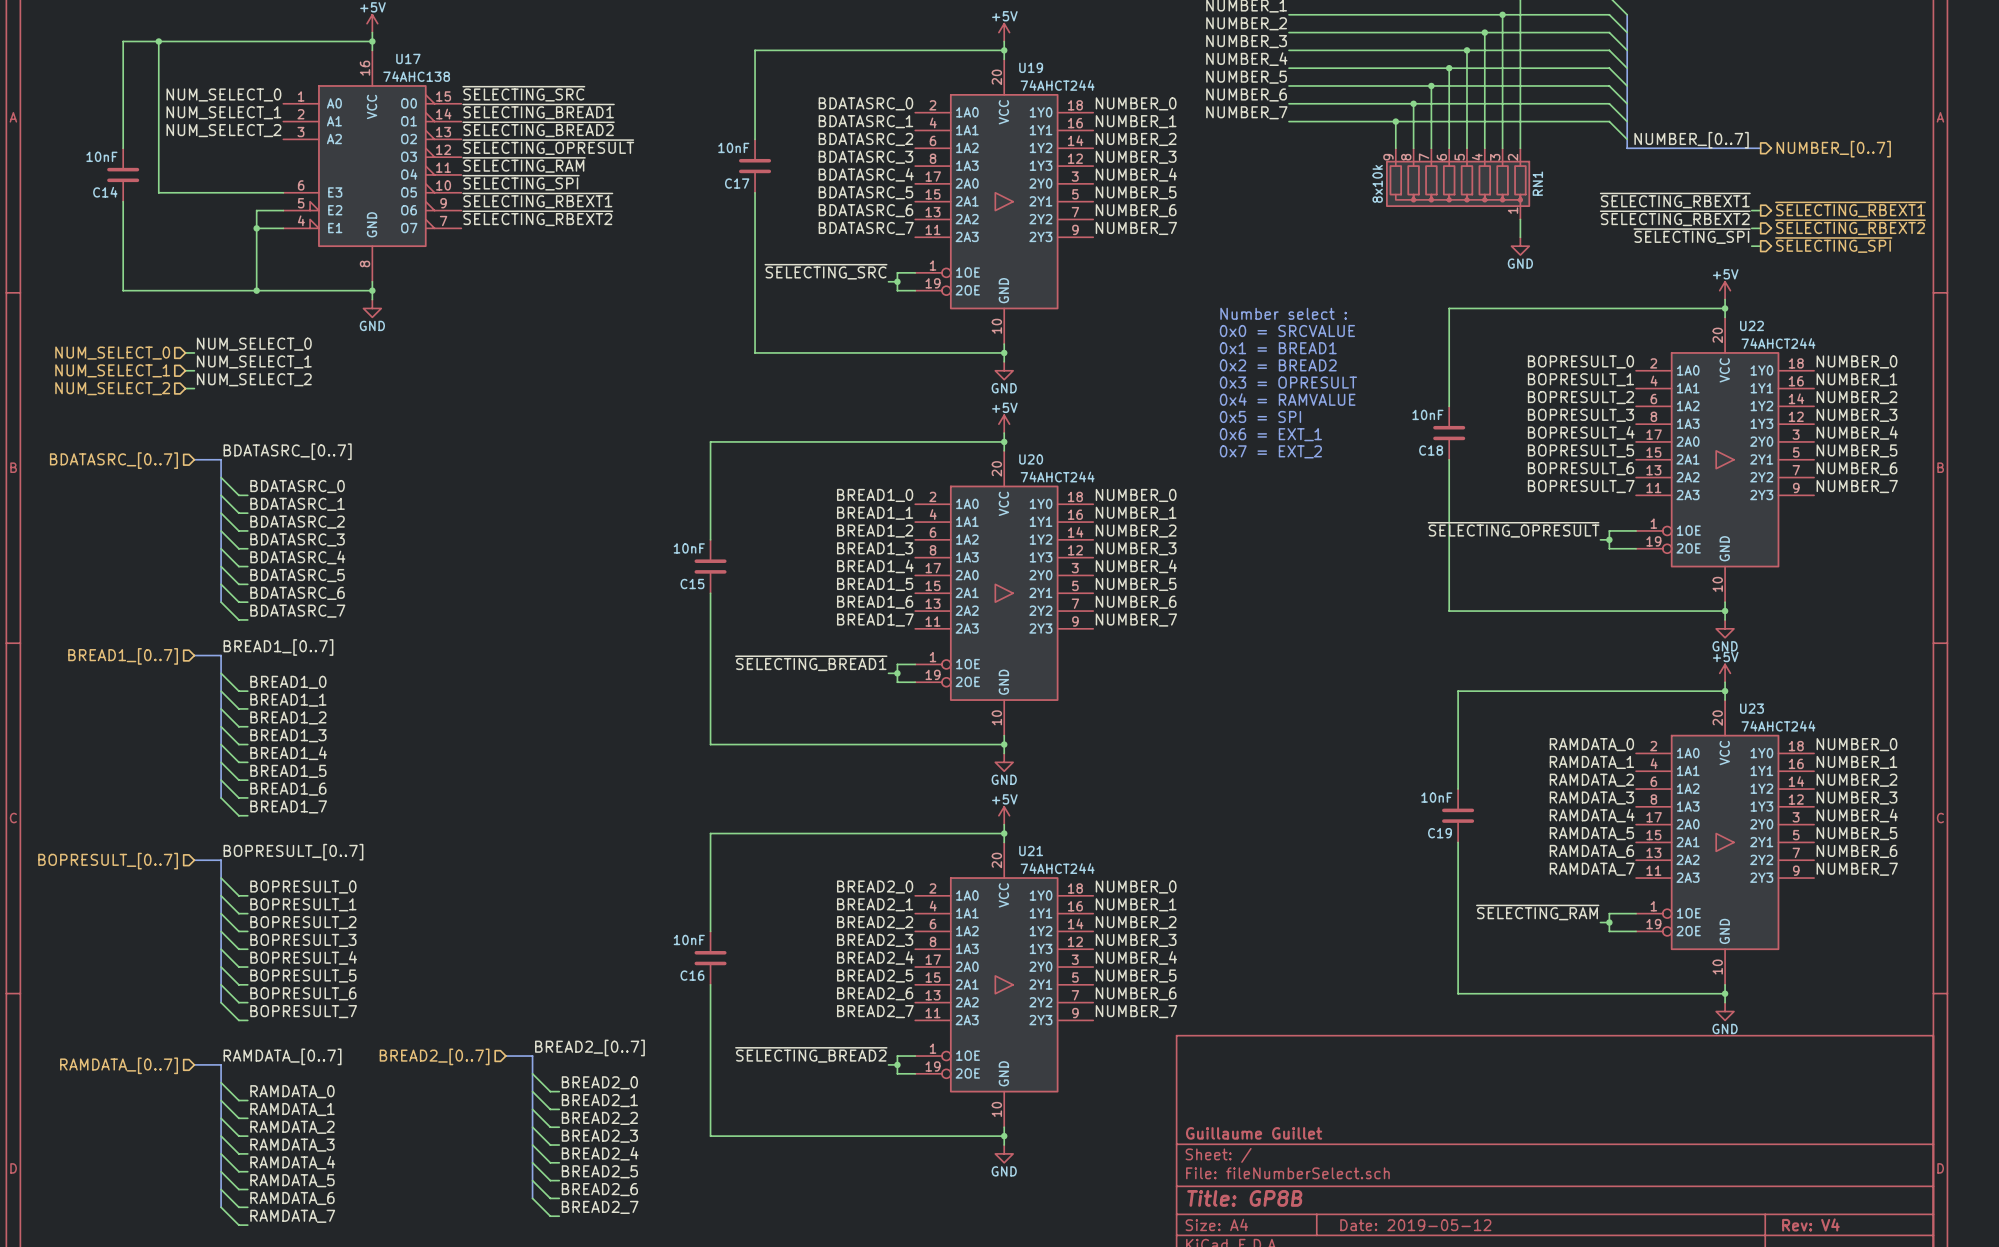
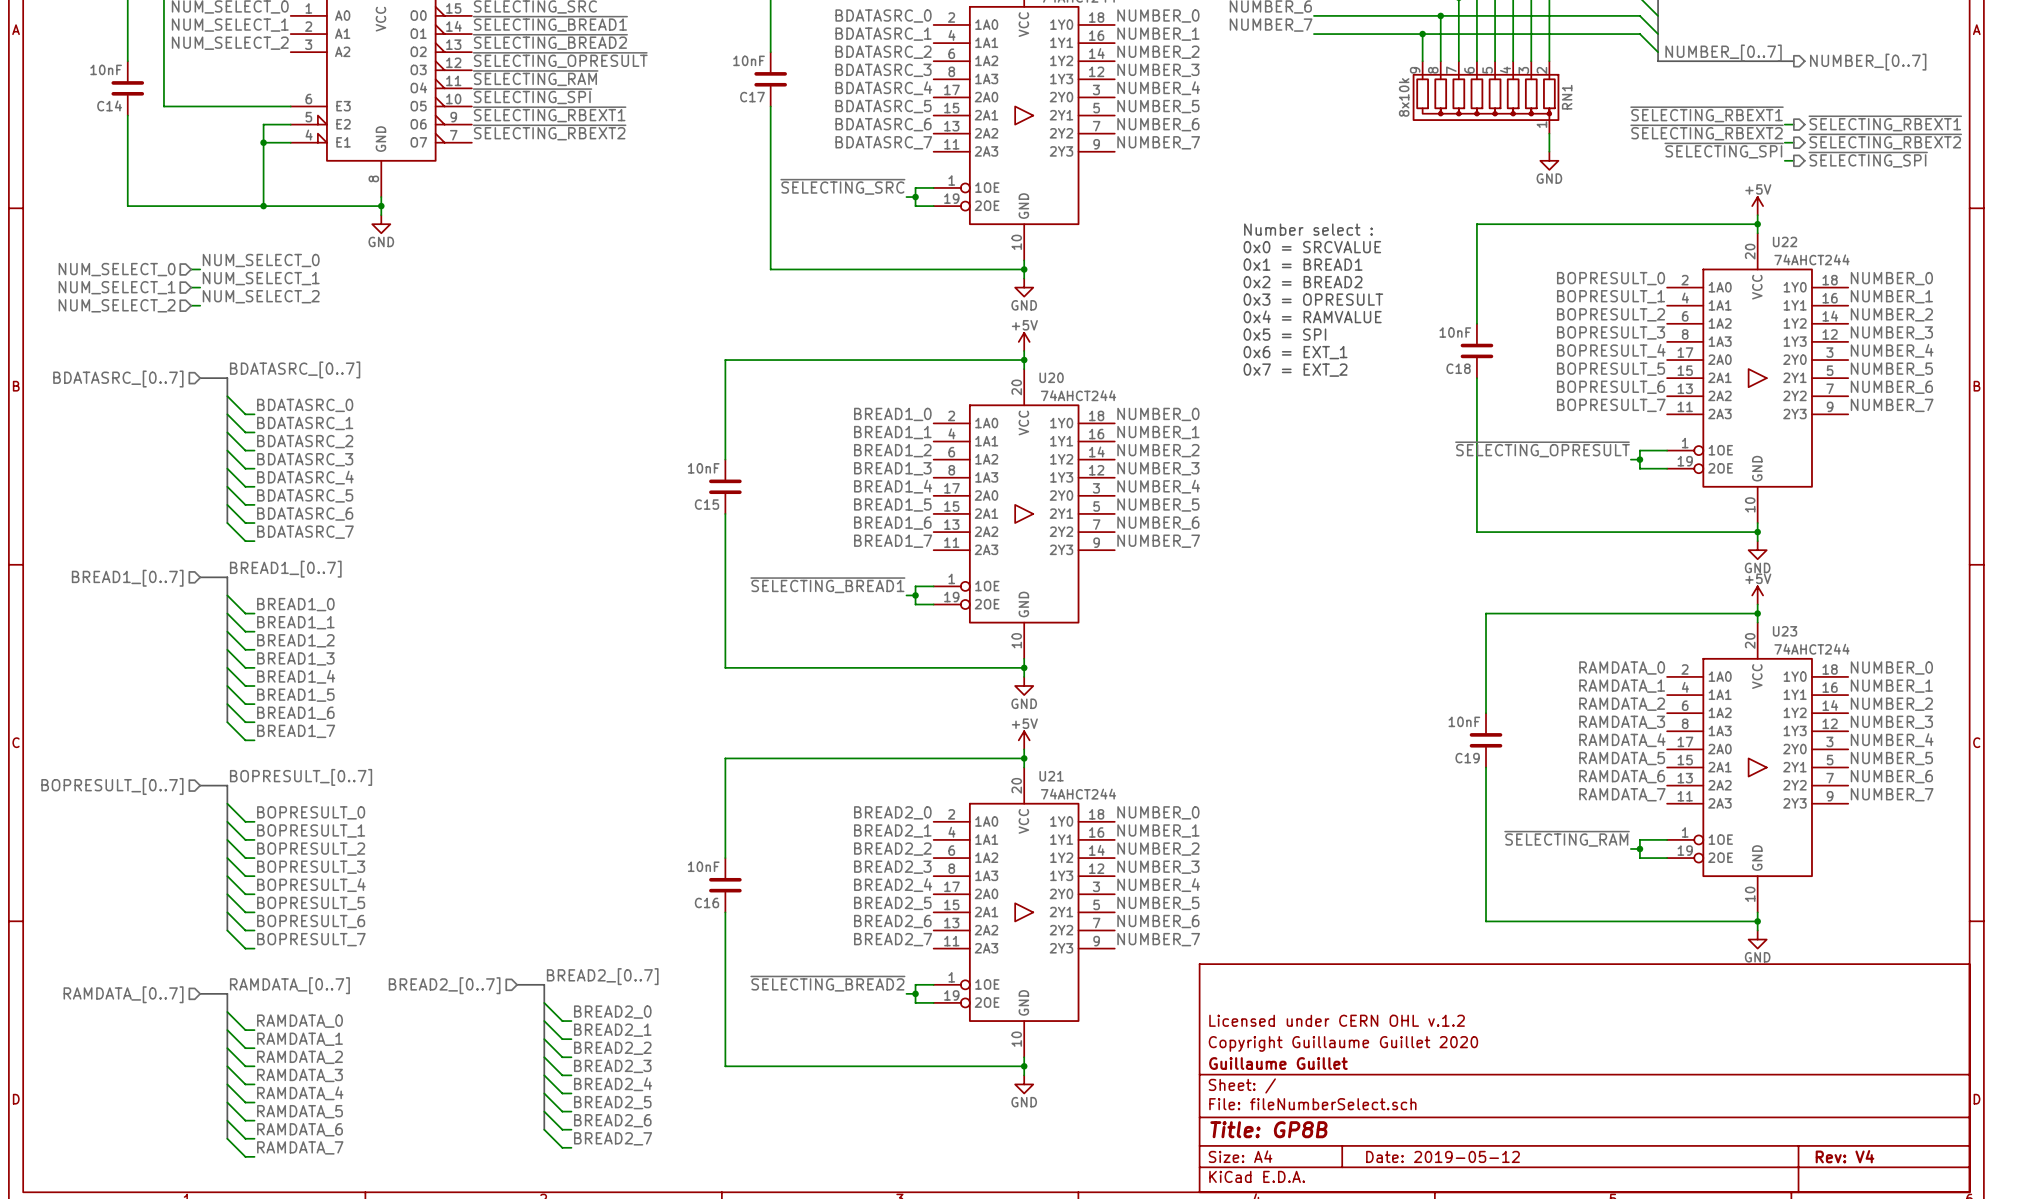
title block: none -> Licensed under CERN OHL v.1.2 (1337, 1020)
title block: none -> Copyright Guillaume Guillet 2020 (1343, 1043)

